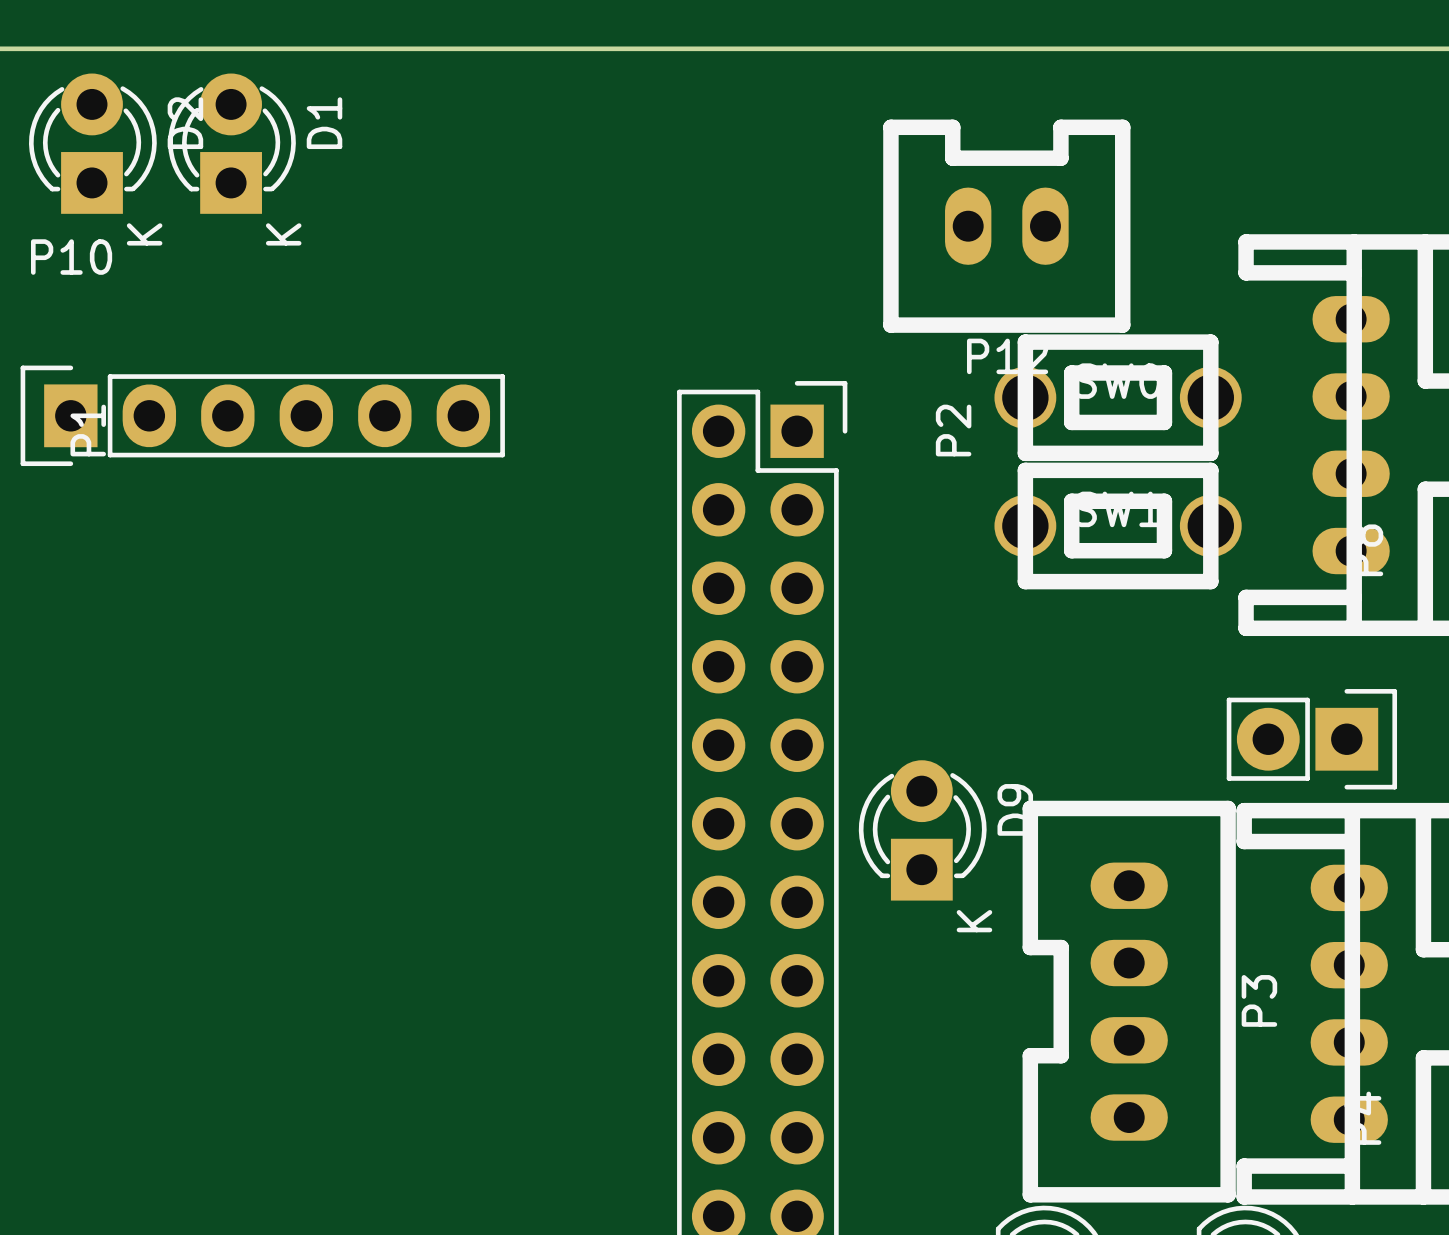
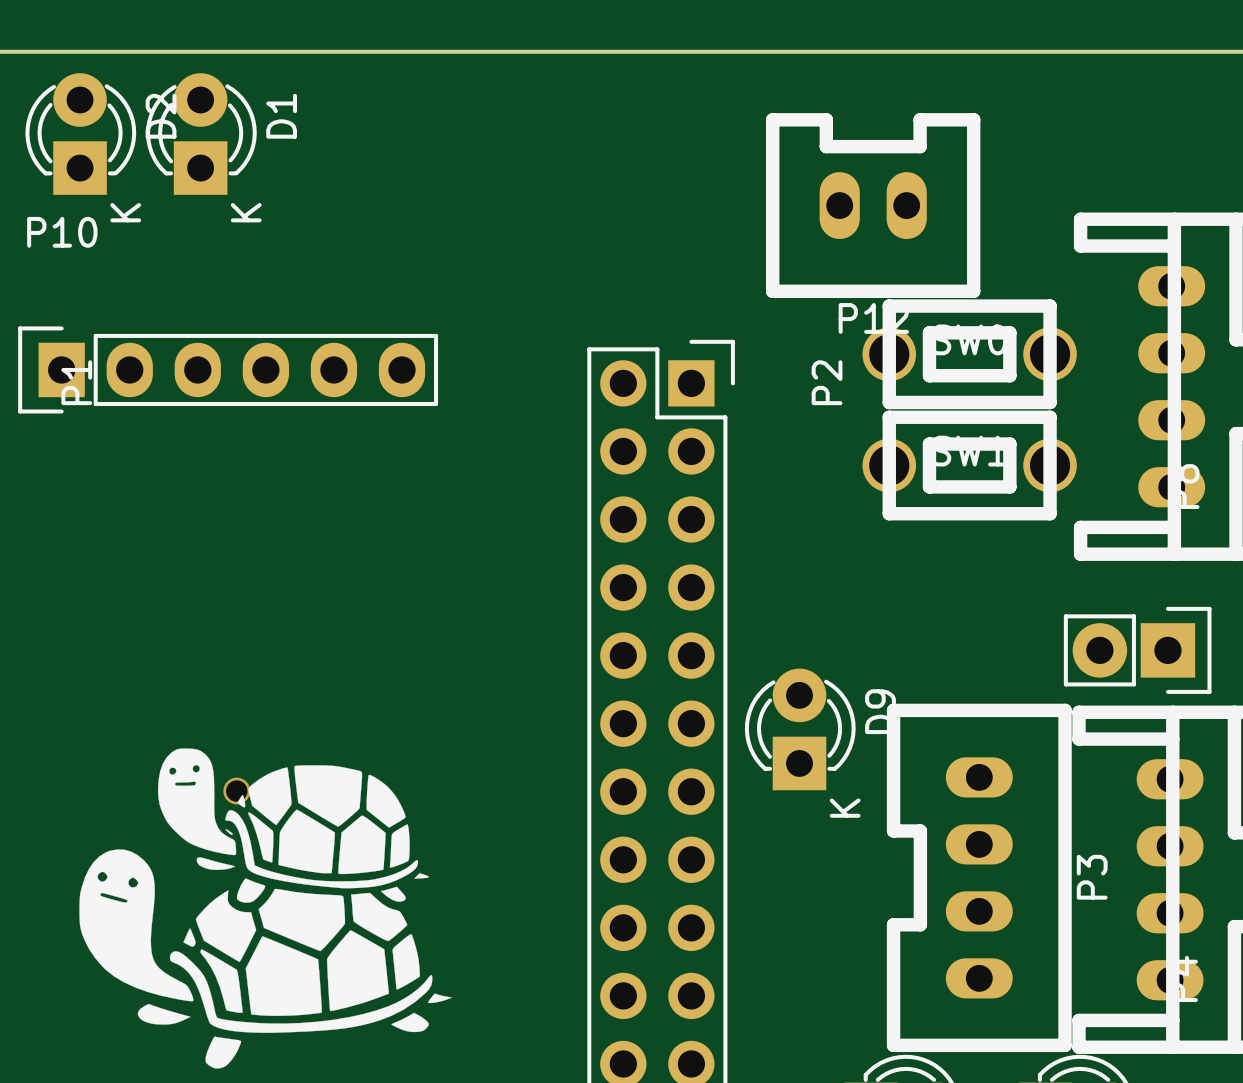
drawing: none -> [79, 748, 453, 1069]
via: none -> (236, 791)

